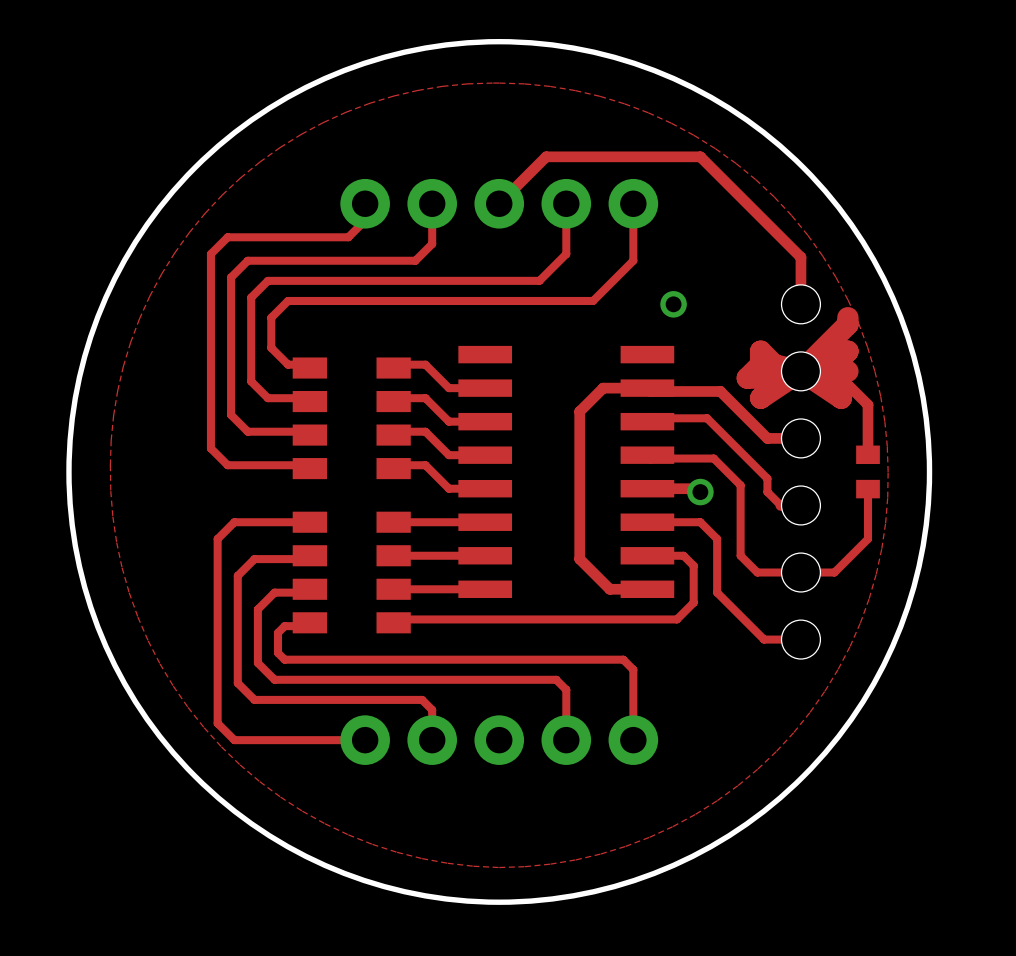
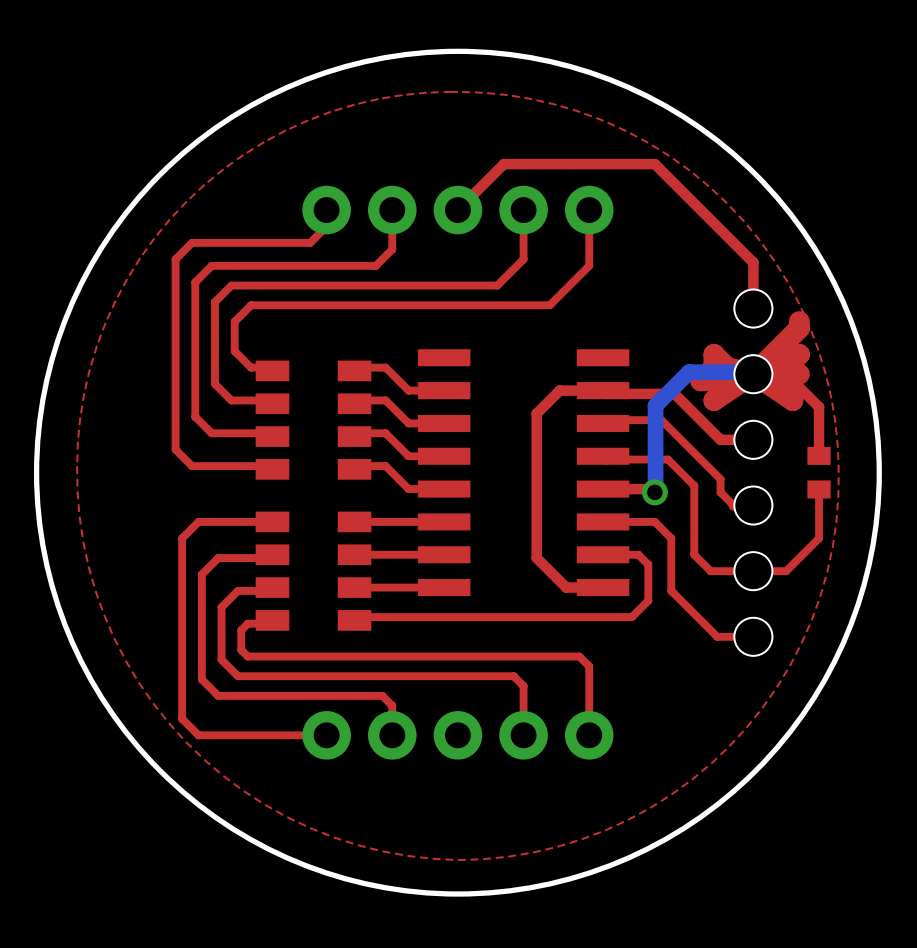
via: (673, 304) -> none
bottom track: none -> (753, 374) (751, 372) (689, 372) (655, 405) (655, 489)

